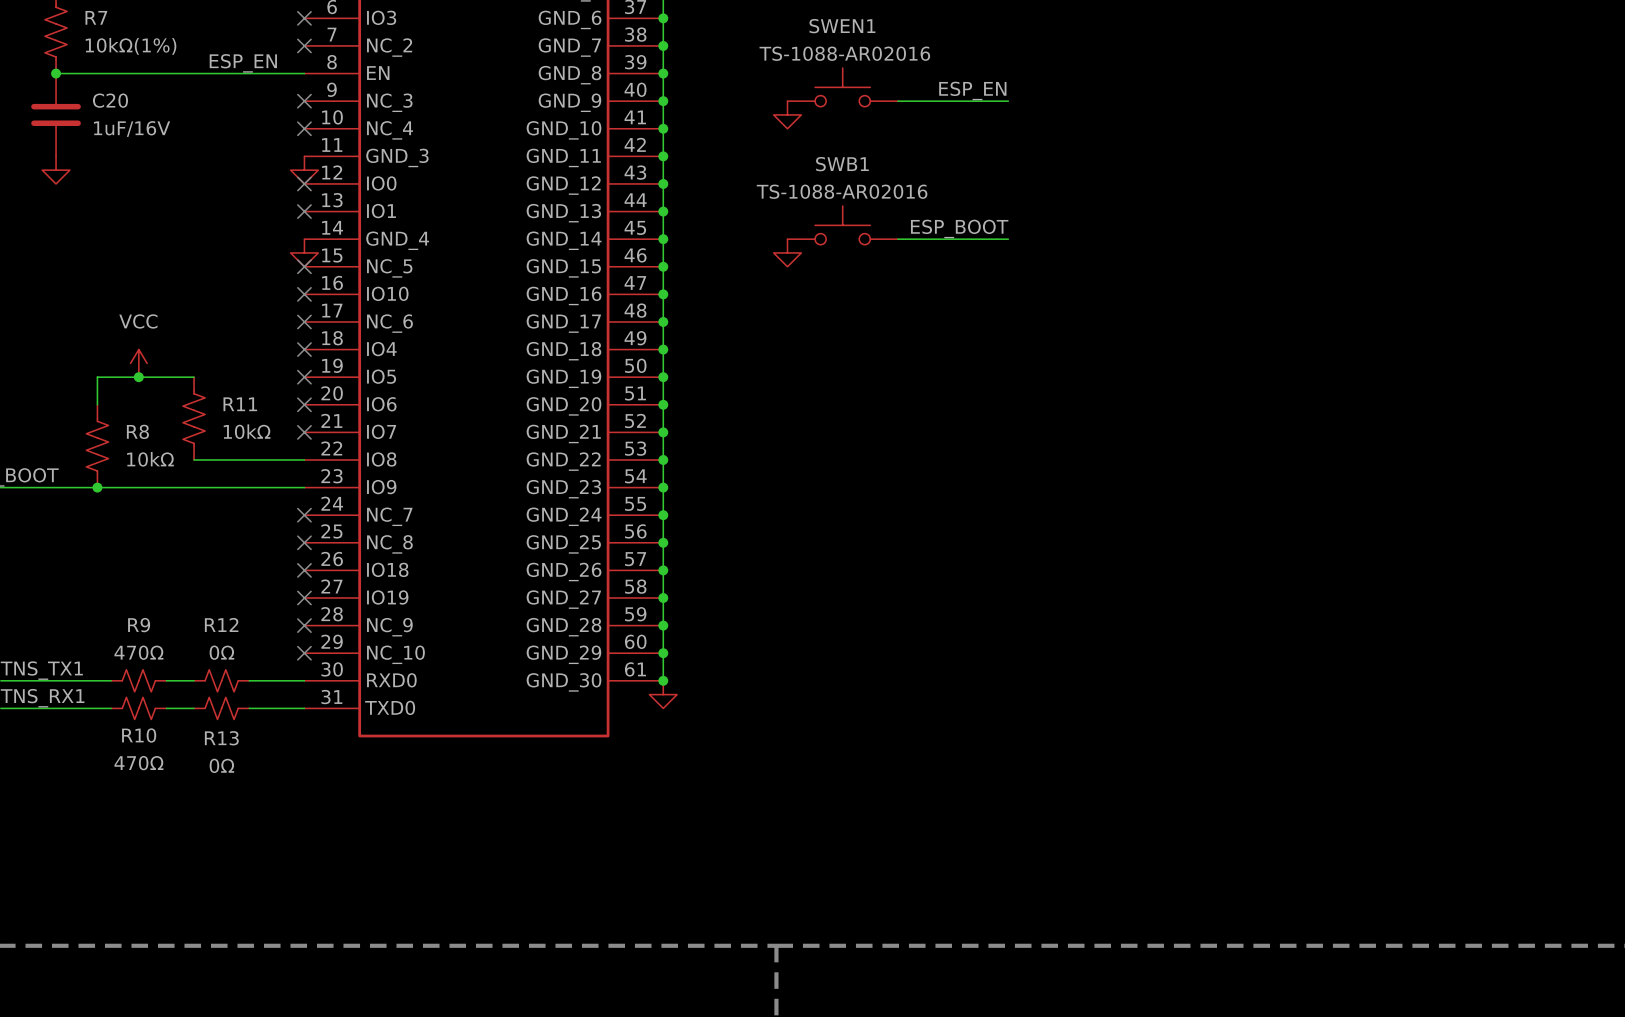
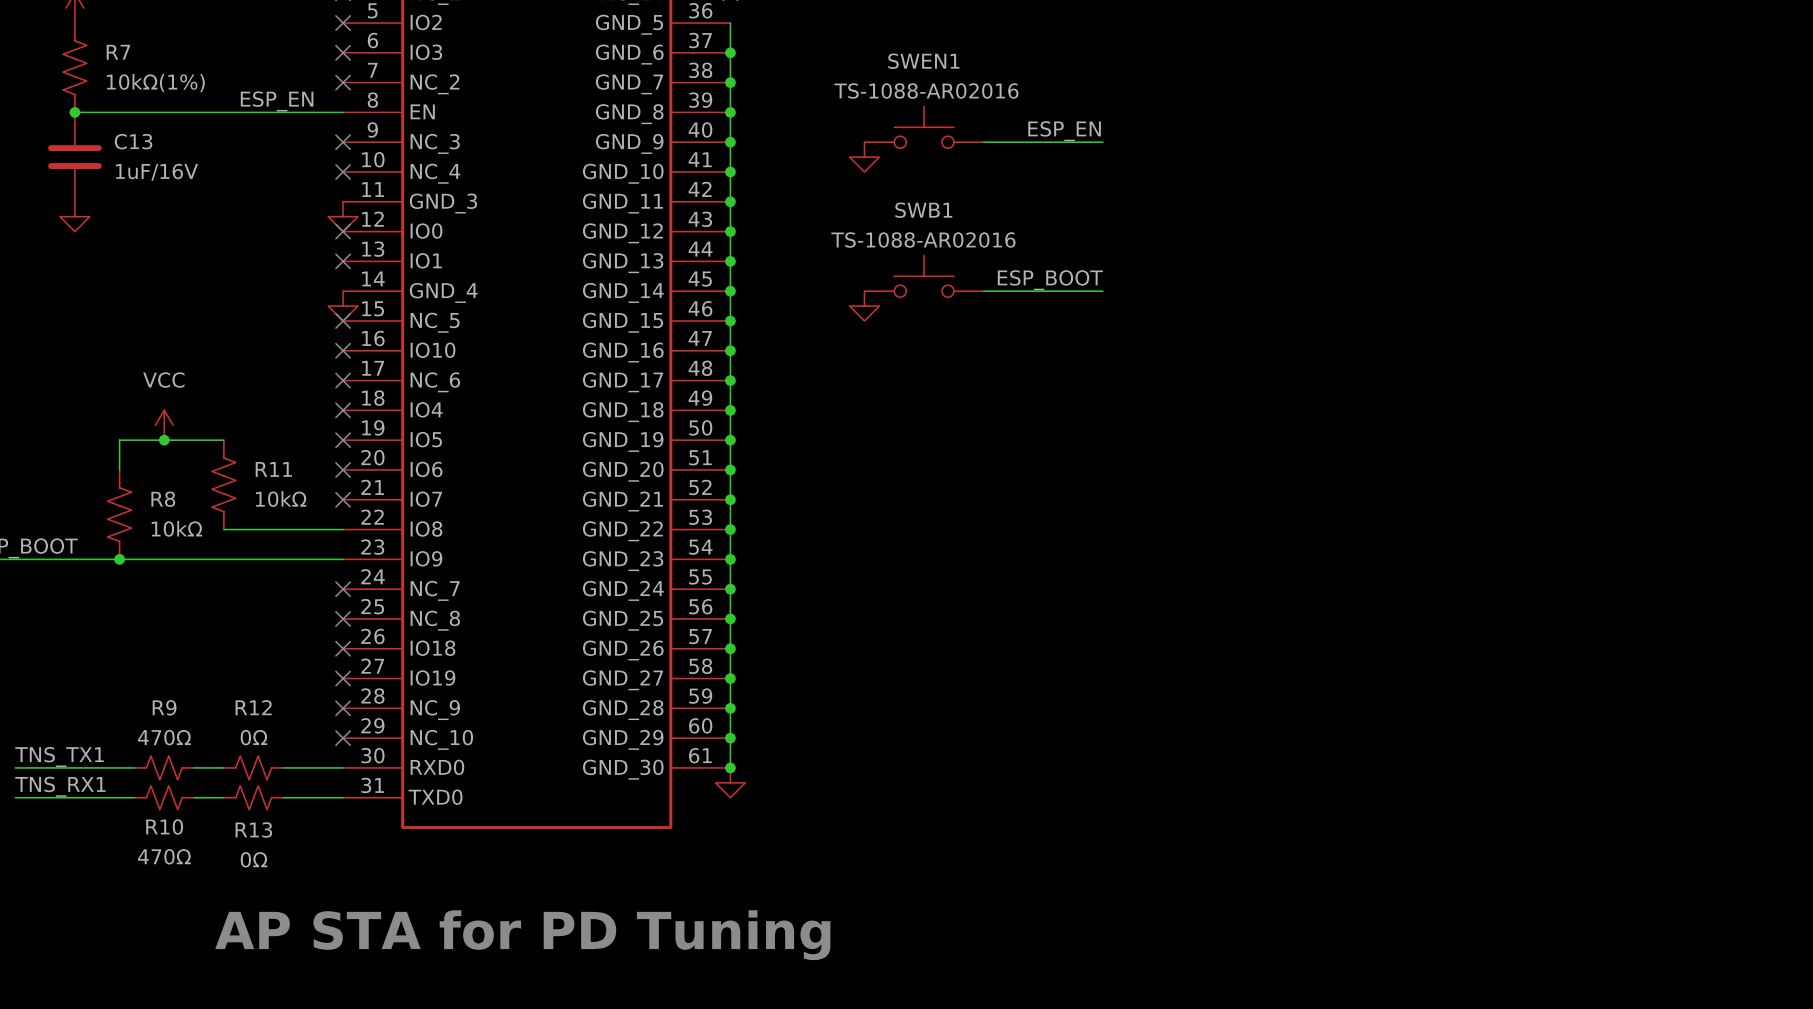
C20 name: C20 (110, 100) -> C13 (133, 141)
text: none -> AP STA for PD Tuning (522, 935)

